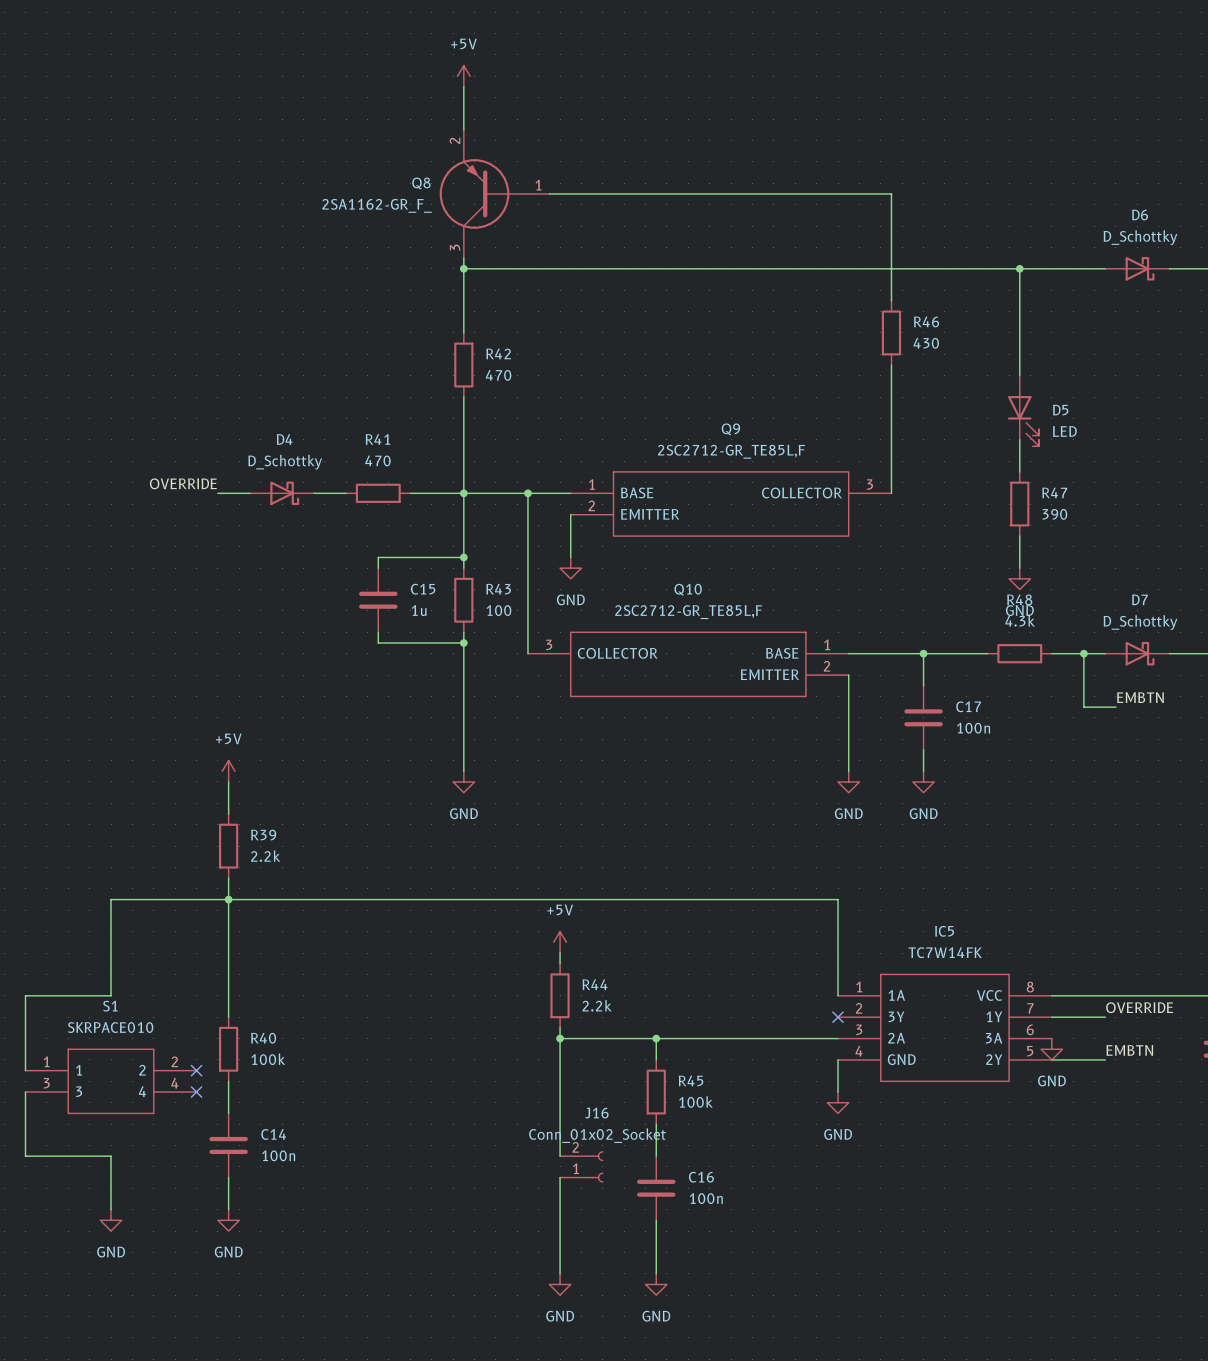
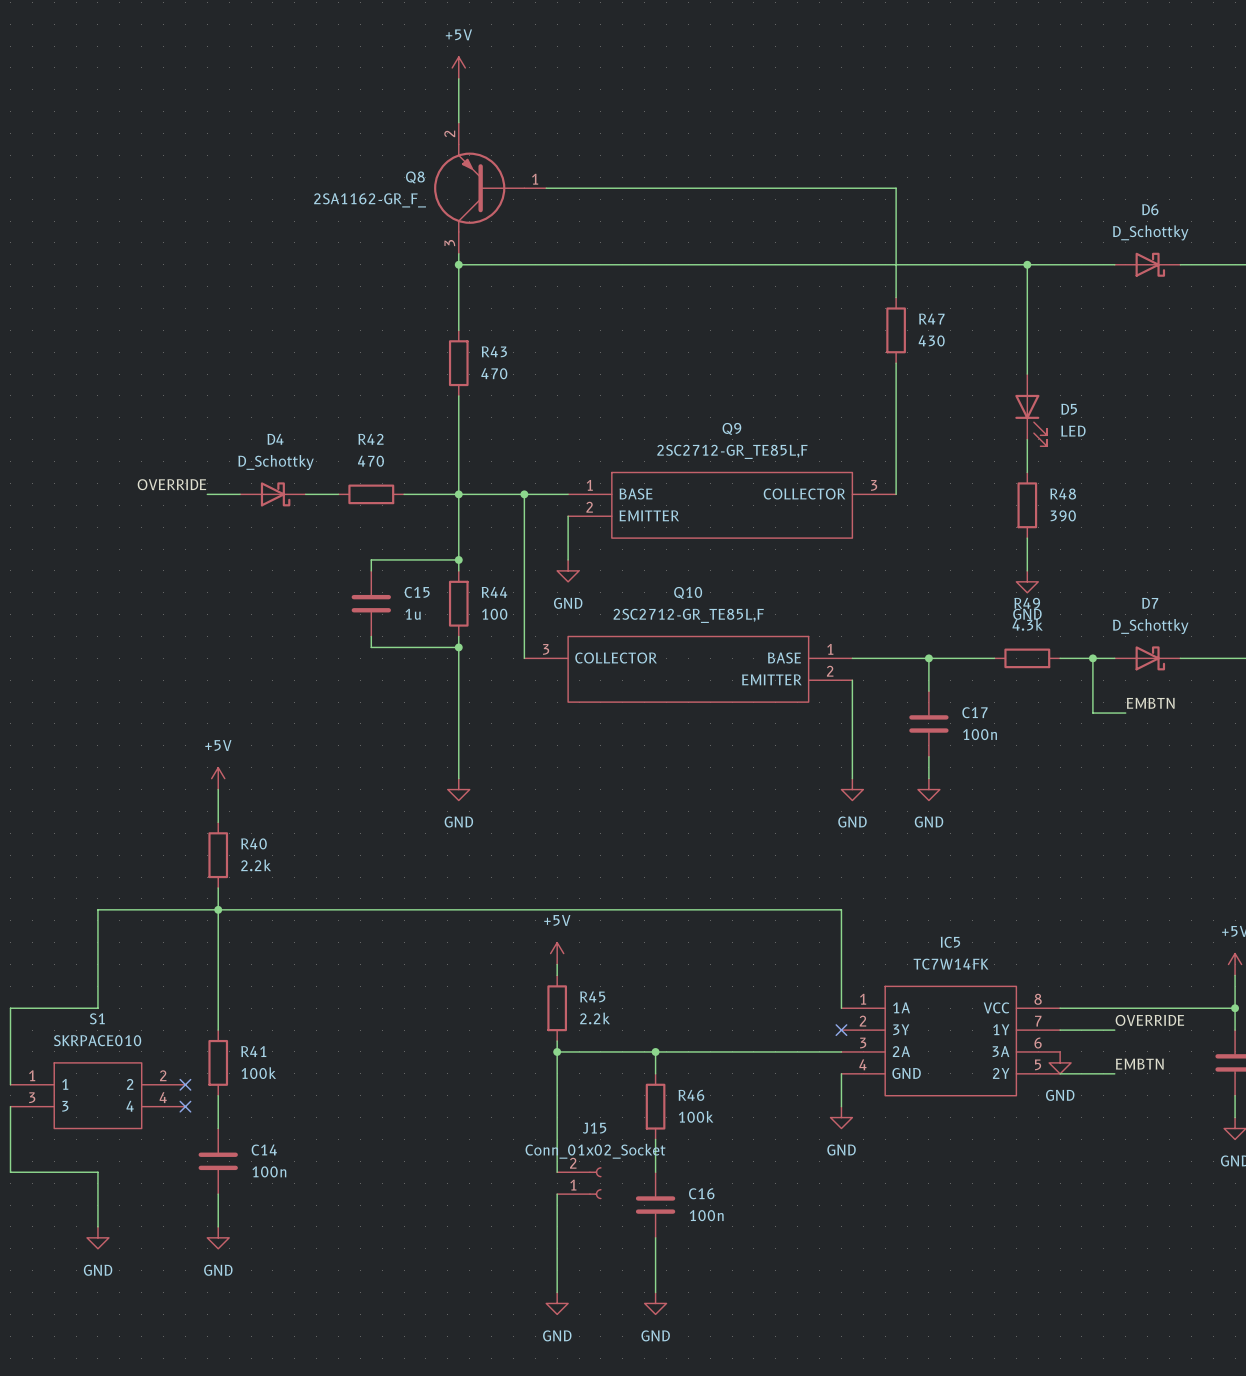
R46 name: R46 (926, 321) -> R47 (931, 319)
R42 name: R42 (498, 353) -> R43 (494, 351)
R41 name: R41 (377, 439) -> R42 (370, 439)
R47 name: R47 (1054, 492) -> R48 (1063, 494)
R43 name: R43 (498, 589) -> R44 (494, 592)
R48 name: R48 (1019, 599) -> R49 (1027, 603)
R39 name: R39 (263, 835) -> R40 (254, 843)
R44 name: R44 (594, 984) -> R45 (592, 996)
R40 name: R40 (263, 1038) -> R41 (253, 1051)
R45 name: R45 (691, 1080) -> R46 (691, 1095)
J16 name: J16 (596, 1113) -> J15 (594, 1128)

